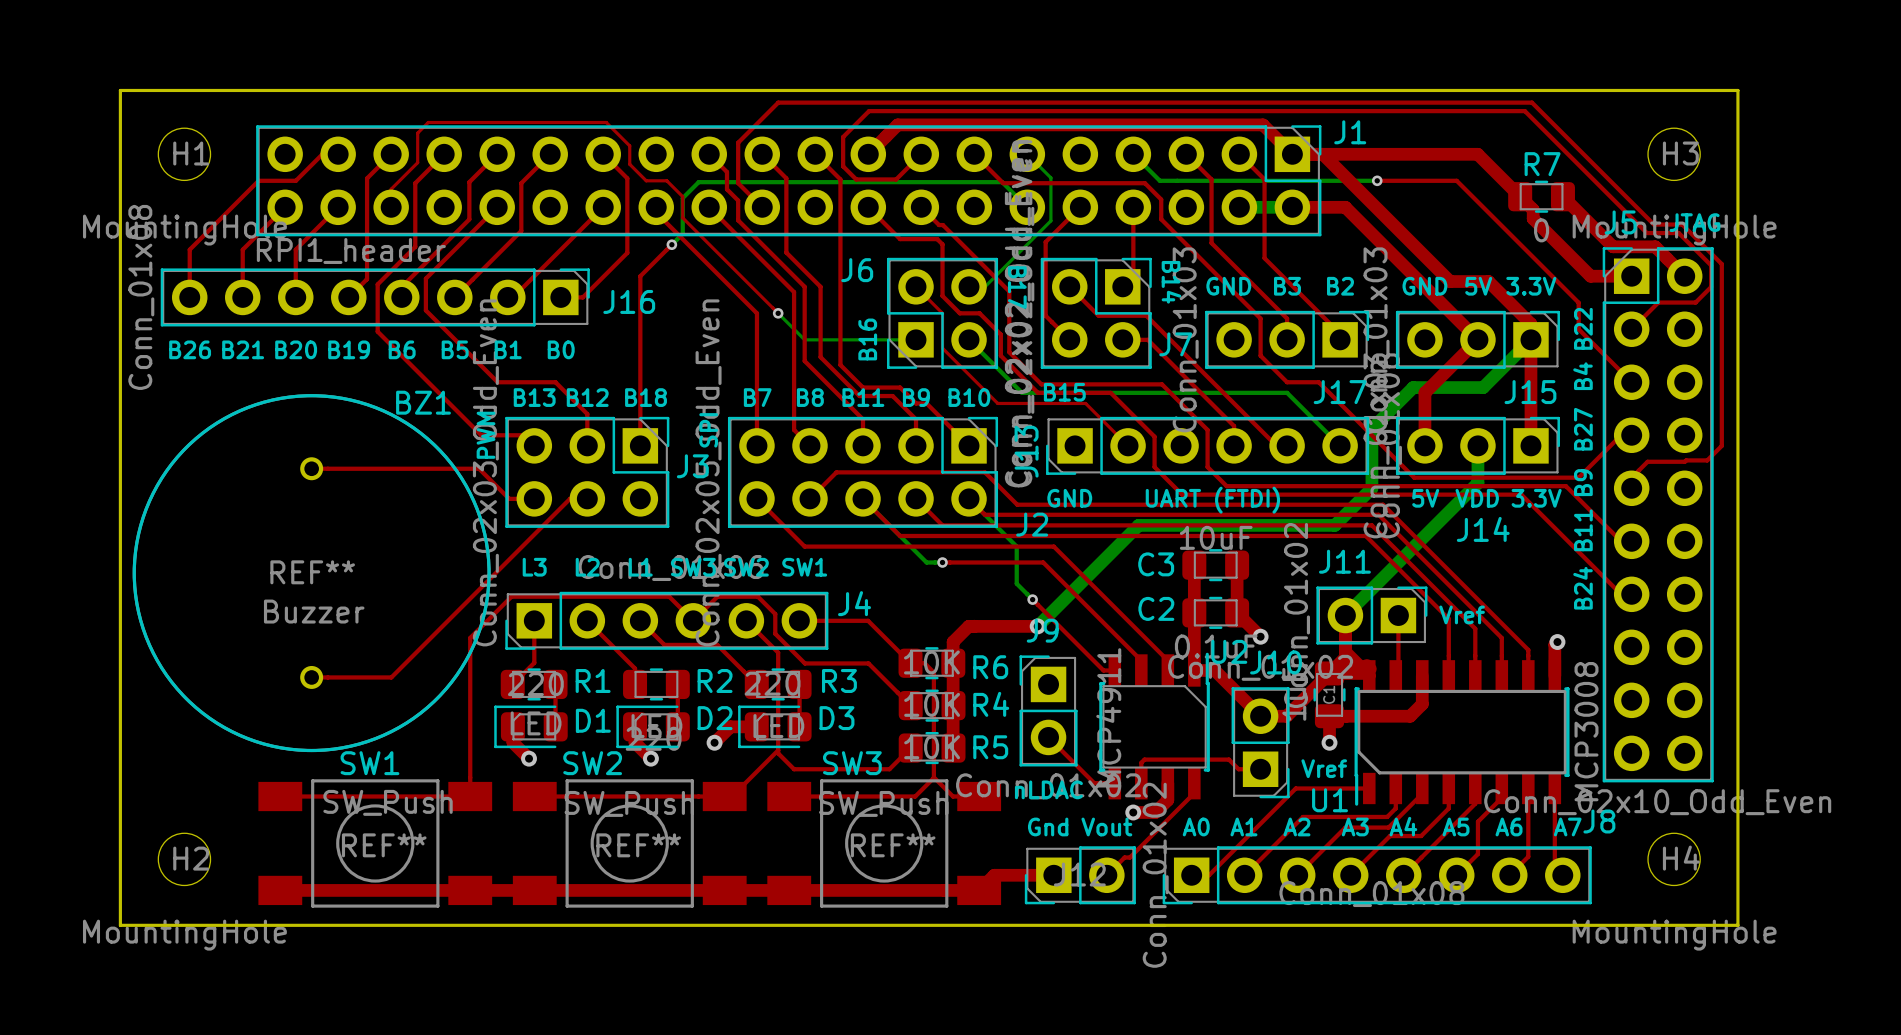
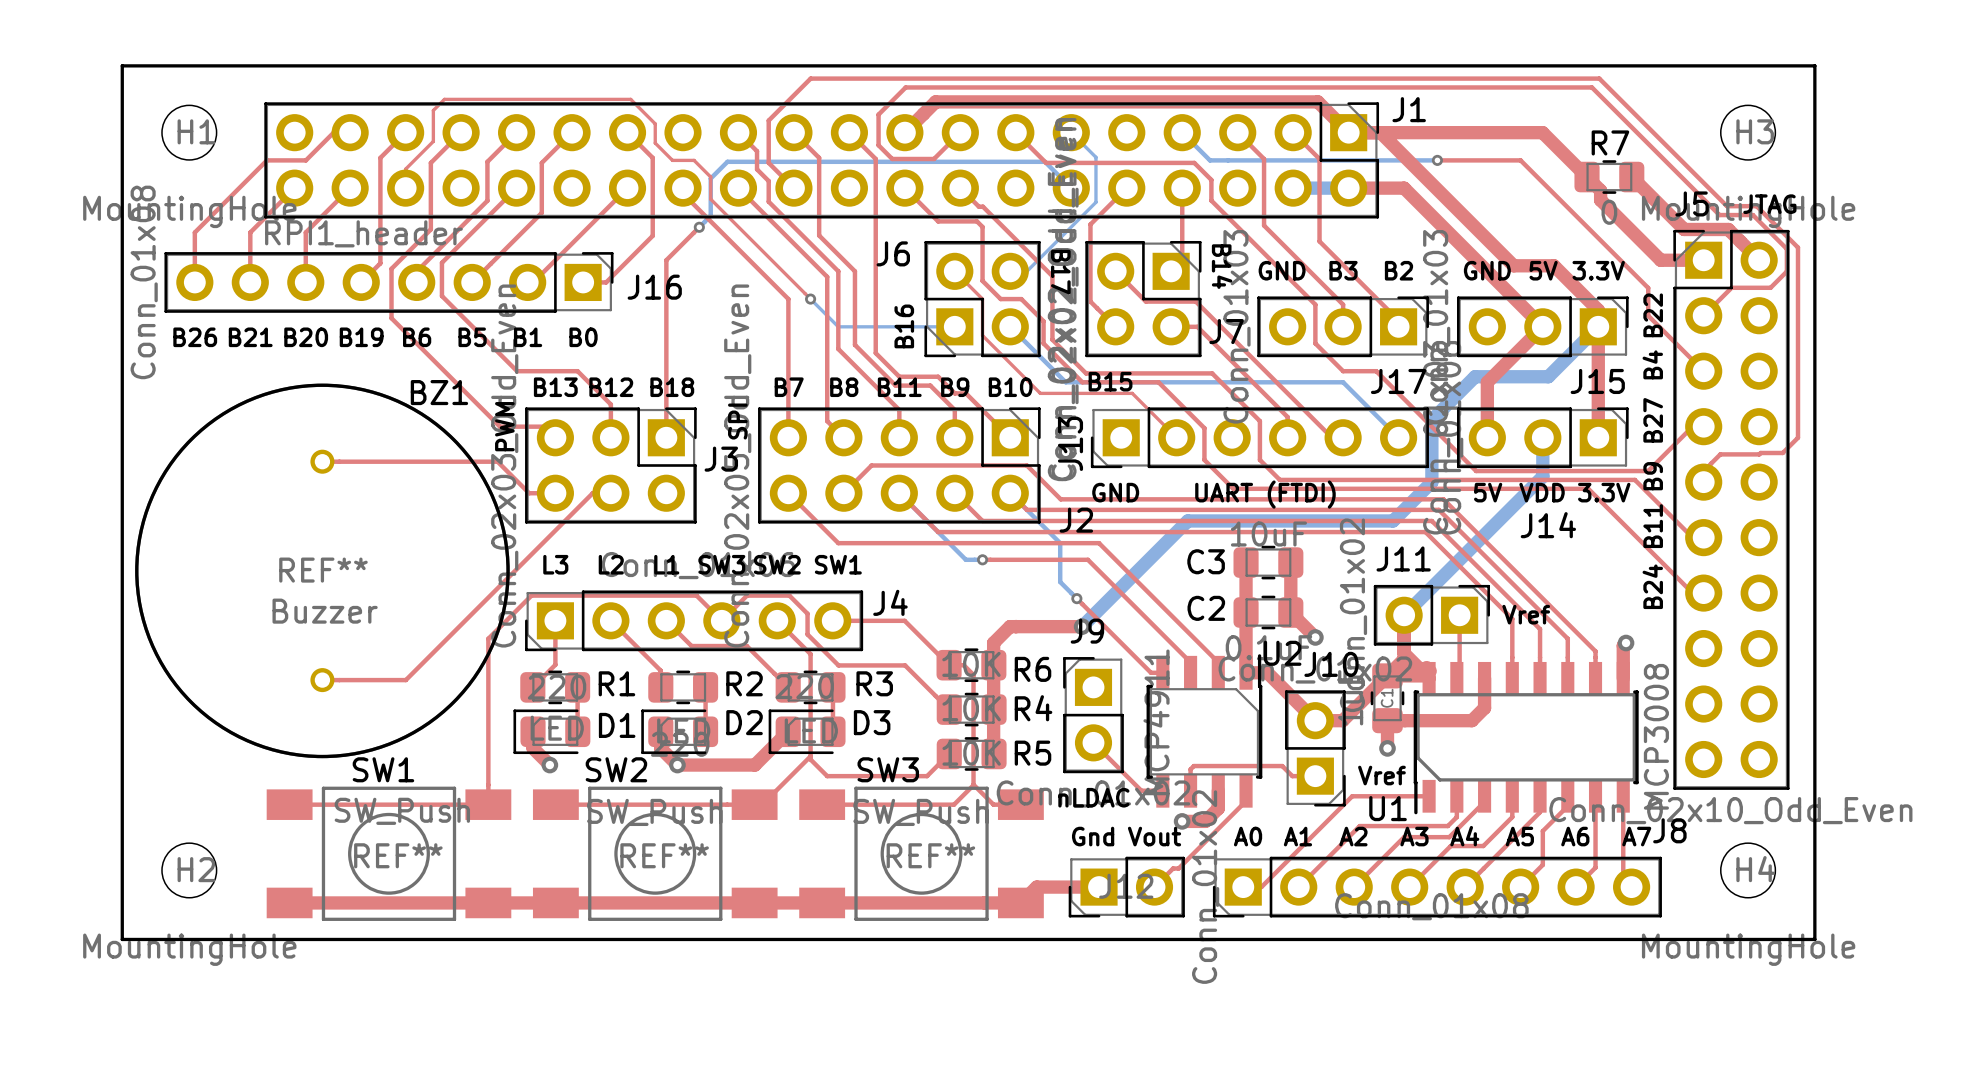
top track: (756, 726) (730, 726) (714, 742) -> (788, 731) (754, 765) (677, 765)
via: (714, 742) -> none

